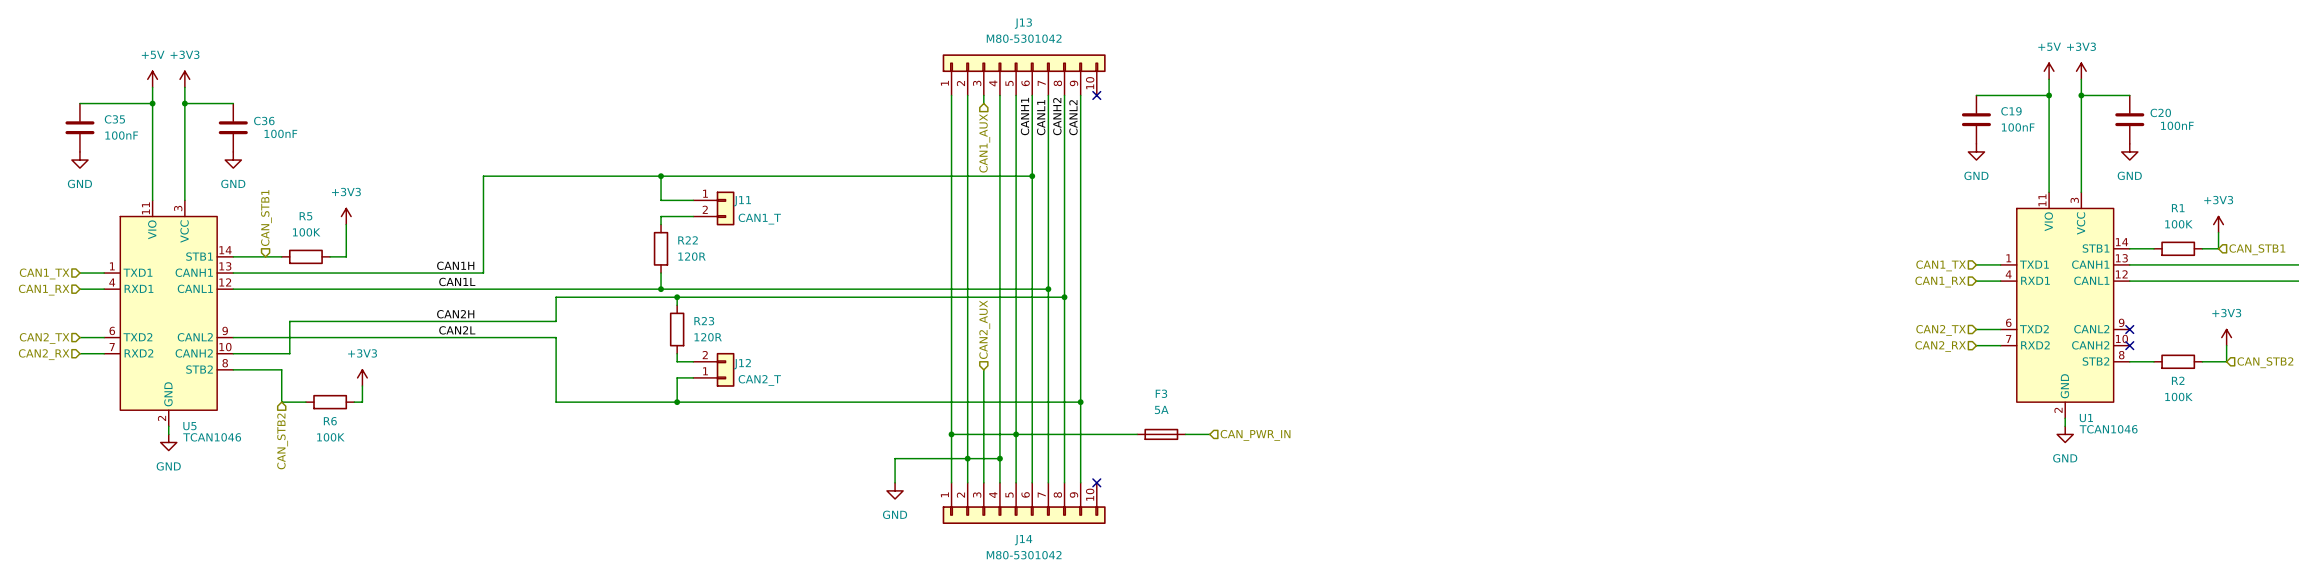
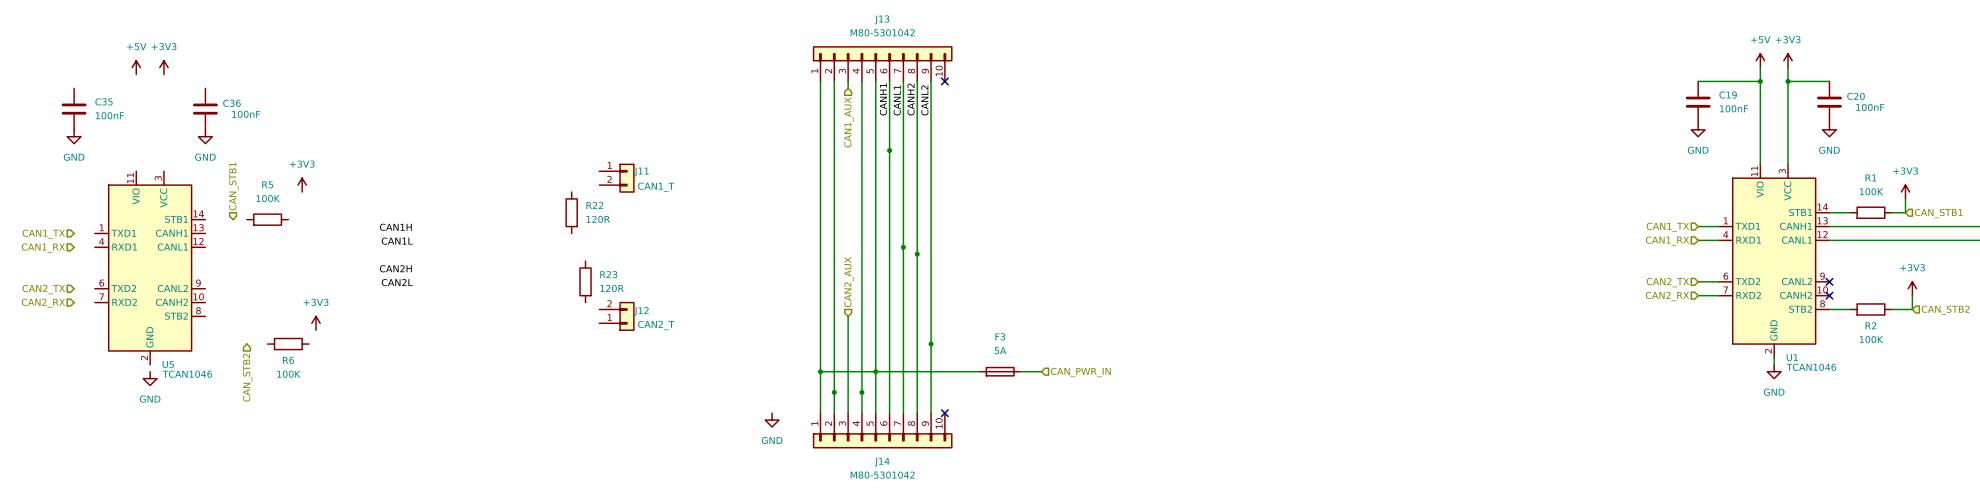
wire: (152, 87) (152, 200) -> none
wire: (184, 87) (184, 200) -> none
wire: (79, 103) (152, 103) -> none
junction: (152, 103) -> none
wire: (184, 103) (233, 103) -> none
junction: (184, 103) -> none
wire: (661, 176) (661, 200) (693, 200) -> none
junction: (661, 176) -> none
wire: (1032, 176) (483, 176) (483, 273) (233, 273) -> none
wire: (693, 216) (661, 216) (661, 224) -> none
wire: (346, 224) (346, 256) (330, 256) -> none
wire: (233, 256) (281, 256) -> none
wire: (79, 273) (104, 273) -> none
wire: (661, 273) (661, 289) -> none
wire: (79, 289) (104, 289) -> none
wire: (233, 289) (1048, 289) -> none
junction: (661, 289) -> none
wire: (677, 297) (677, 305) -> none
junction: (677, 297) -> none
wire: (1064, 297) (556, 297) (556, 321) (289, 321) (289, 353) (233, 353) -> none
wire: (79, 337) (104, 337) -> none
wire: (233, 337) (556, 337) (556, 402) (1080, 402) -> none
wire: (79, 353) (104, 353) -> none
wire: (677, 353) (677, 361) (693, 361) -> none
wire: (233, 369) (281, 369) (281, 402) (305, 402) -> none
wire: (693, 377) (677, 377) (677, 402) -> none
wire: (362, 386) (362, 402) (354, 402) -> none
junction: (677, 402) -> none
wire: (168, 426) (168, 434) -> none
wire: (999, 458) (895, 458) (895, 482) -> none

